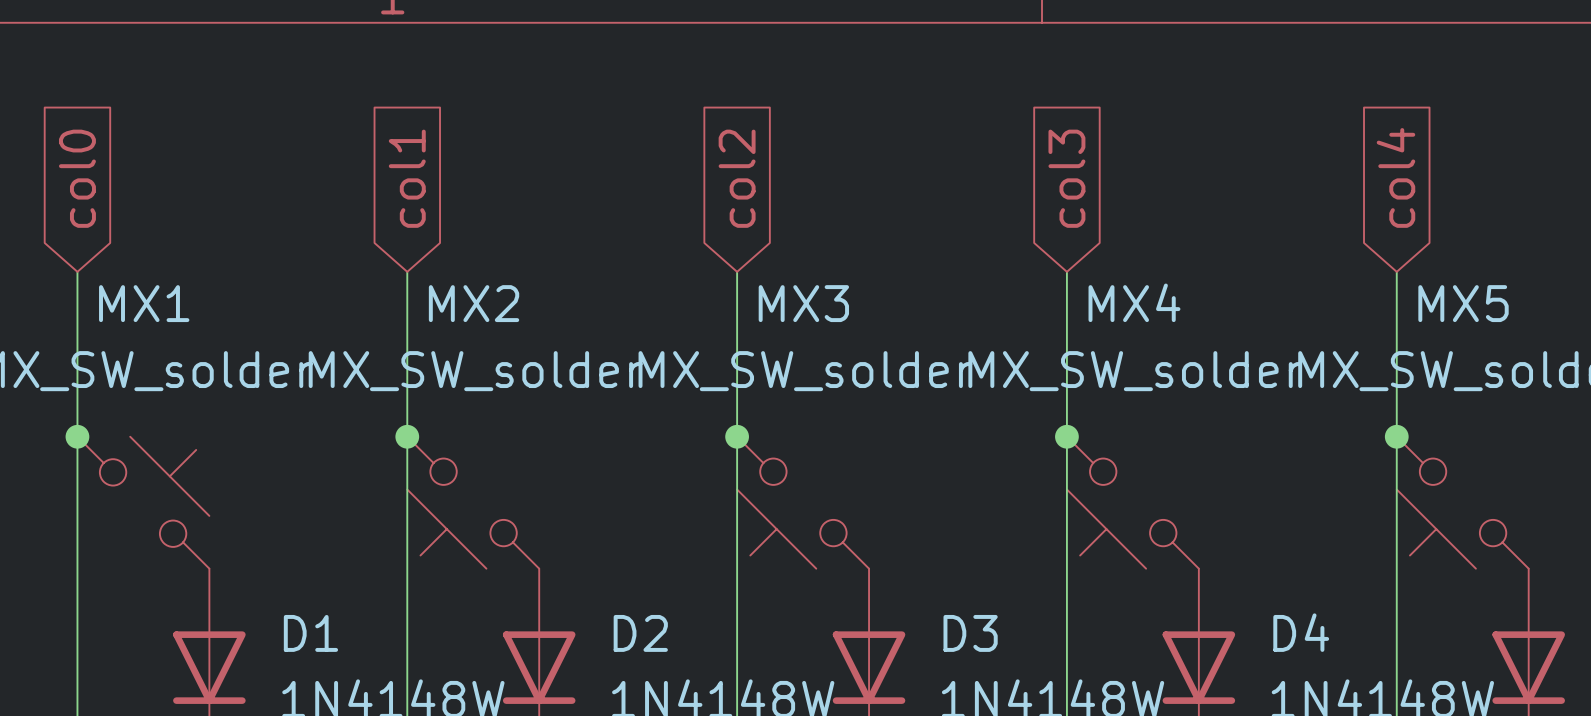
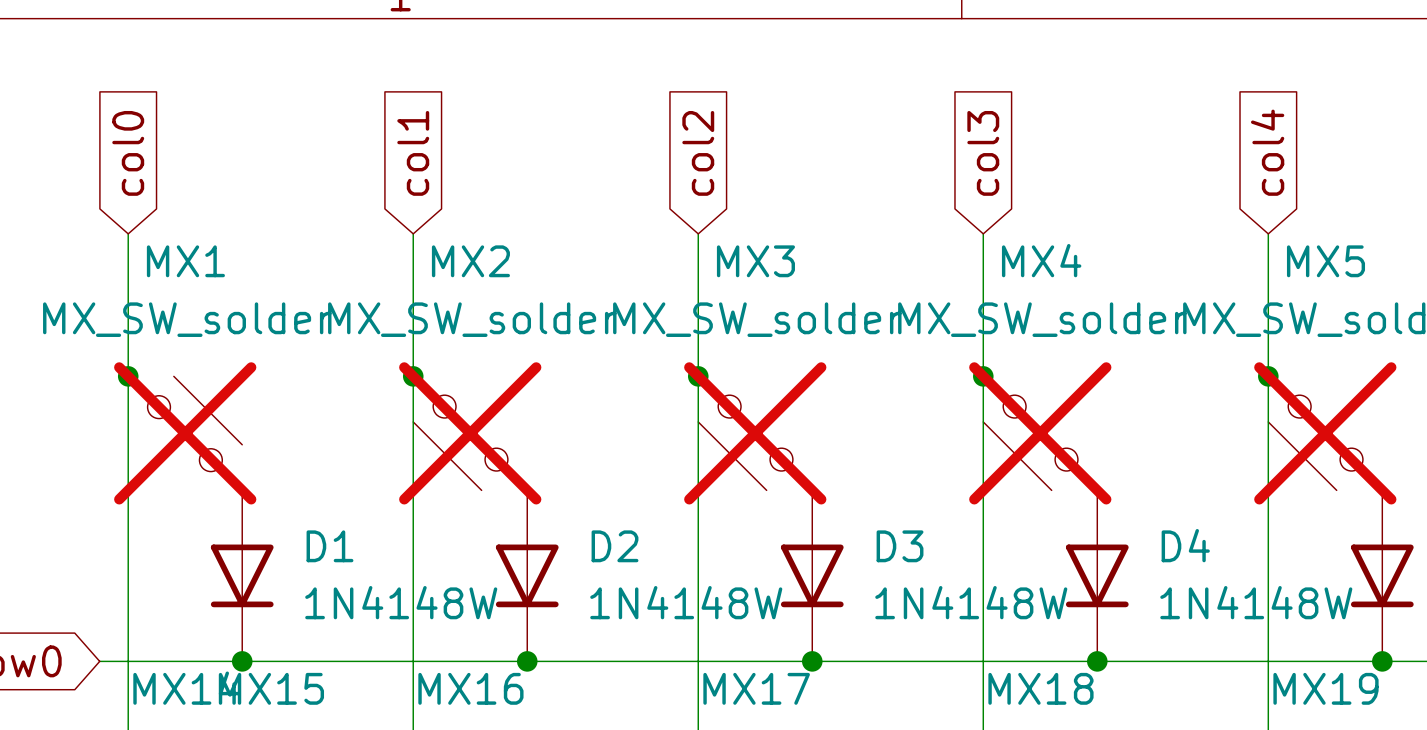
MX1 do-not-place cross: none -> (185, 433)
MX2 do-not-place cross: none -> (470, 433)
MX3 do-not-place cross: none -> (755, 433)
MX4 do-not-place cross: none -> (1040, 433)
MX5 do-not-place cross: none -> (1325, 433)

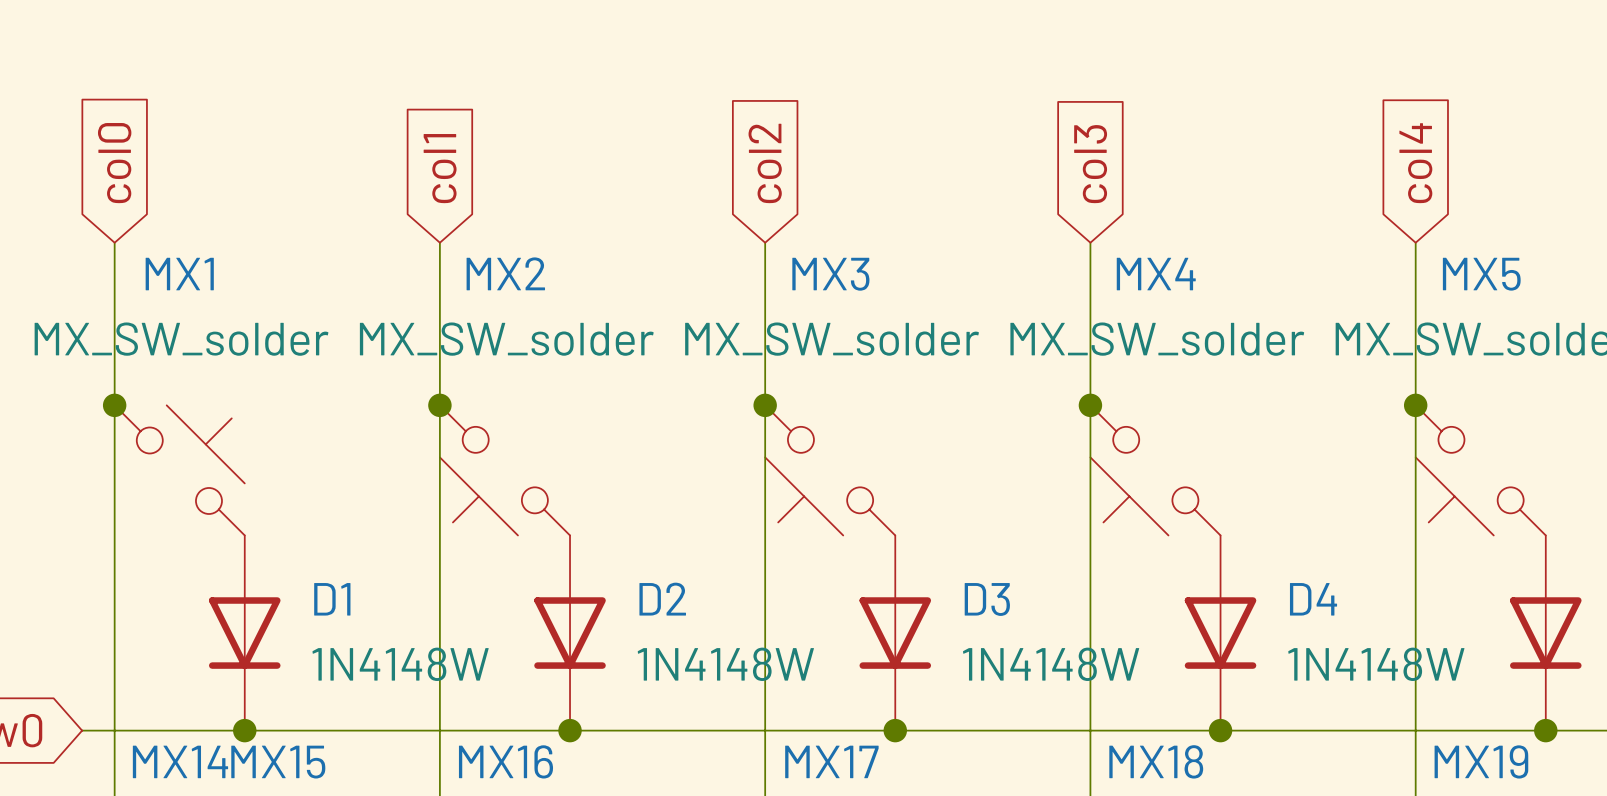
MX1 do-not-place cross: (185, 433) -> none
MX2 do-not-place cross: (470, 433) -> none
MX3 do-not-place cross: (755, 433) -> none
MX4 do-not-place cross: (1040, 433) -> none
MX5 do-not-place cross: (1325, 433) -> none

